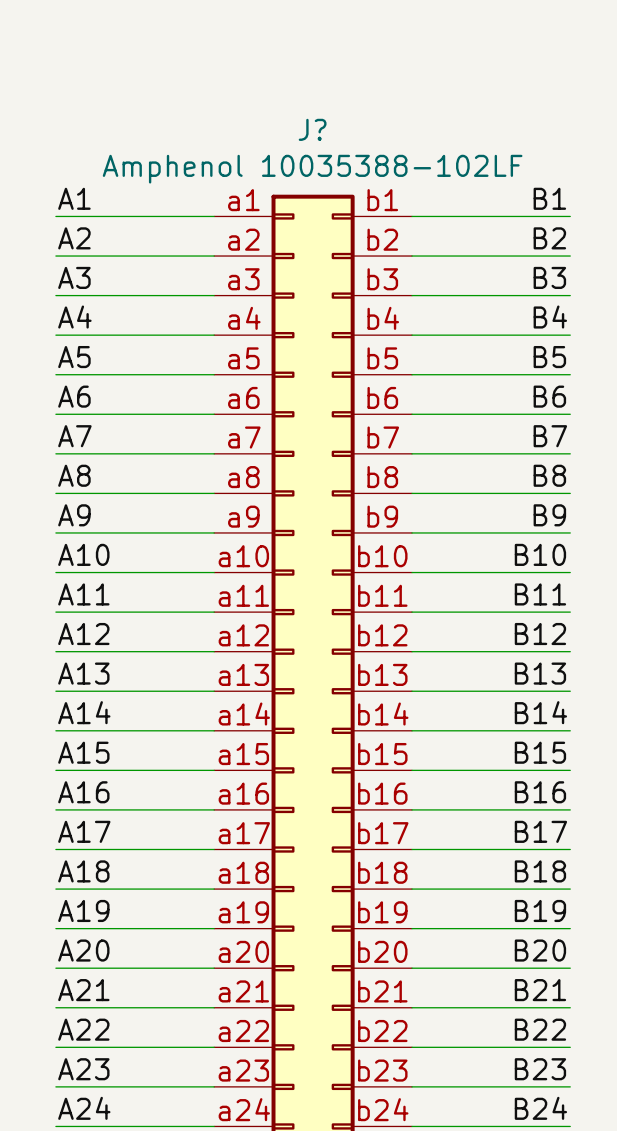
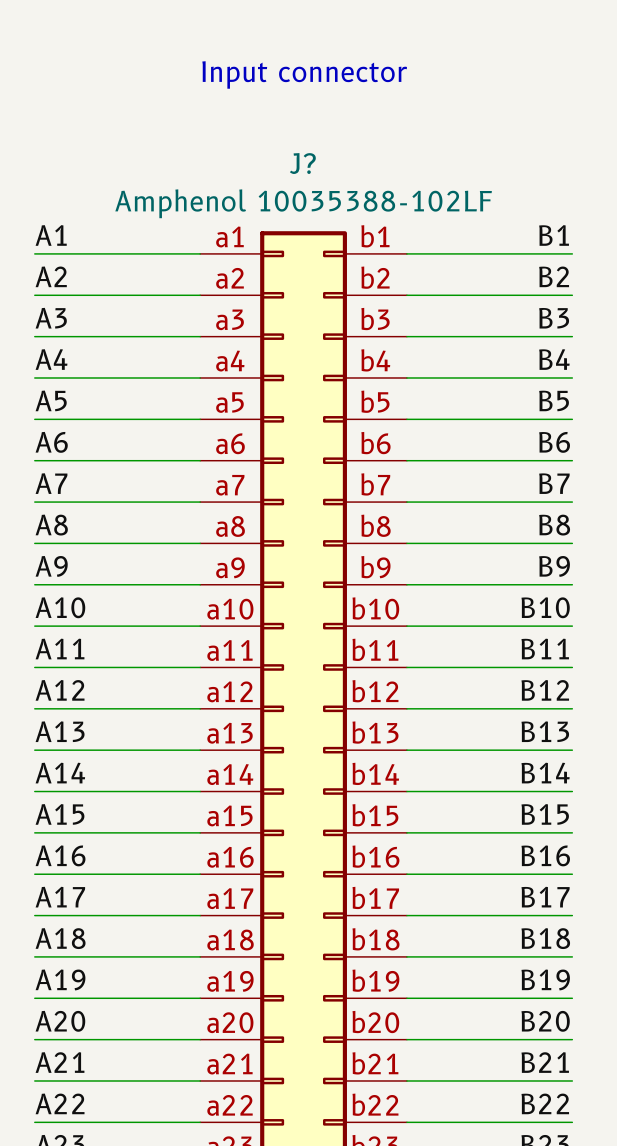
text: none -> Input connector (304, 74)

